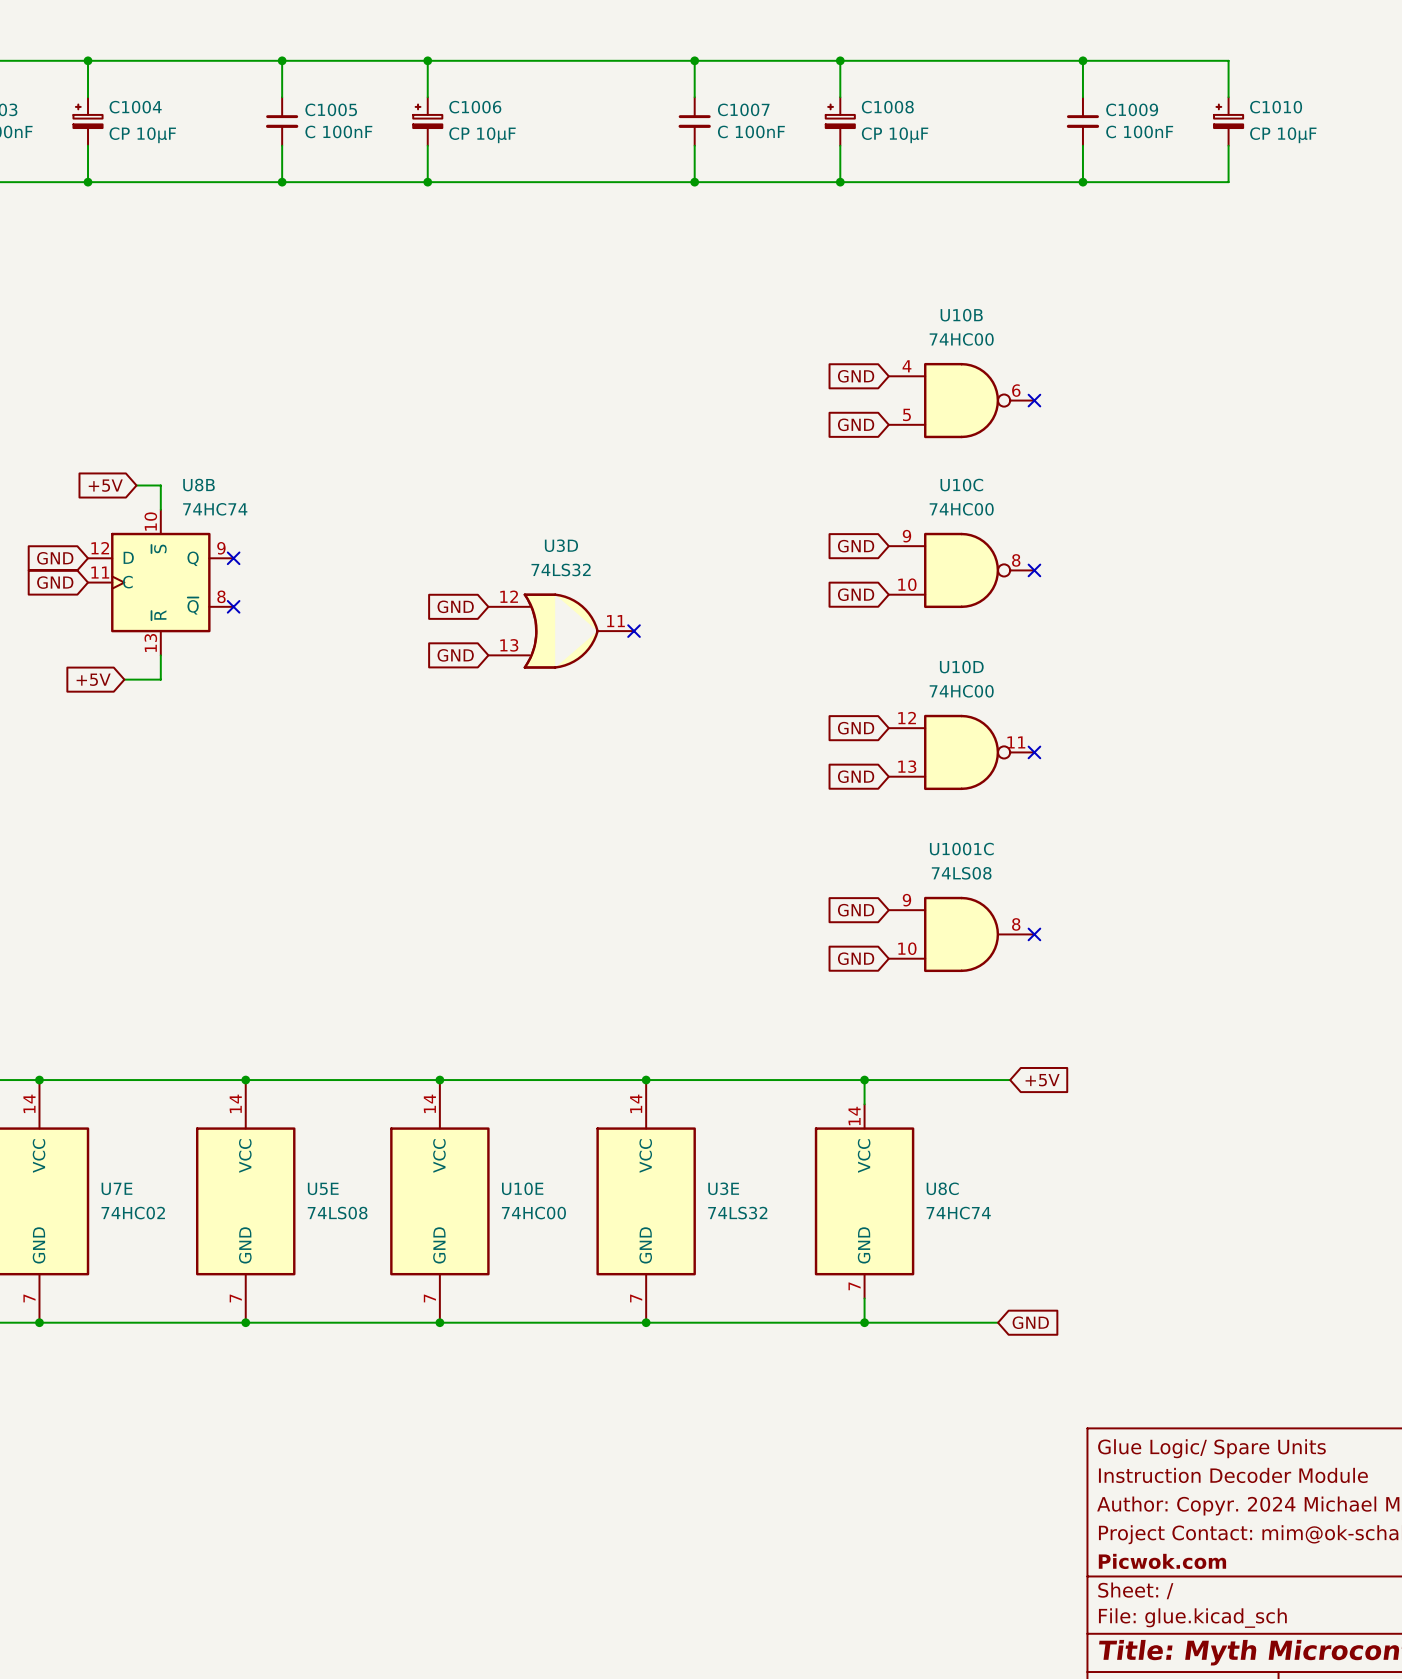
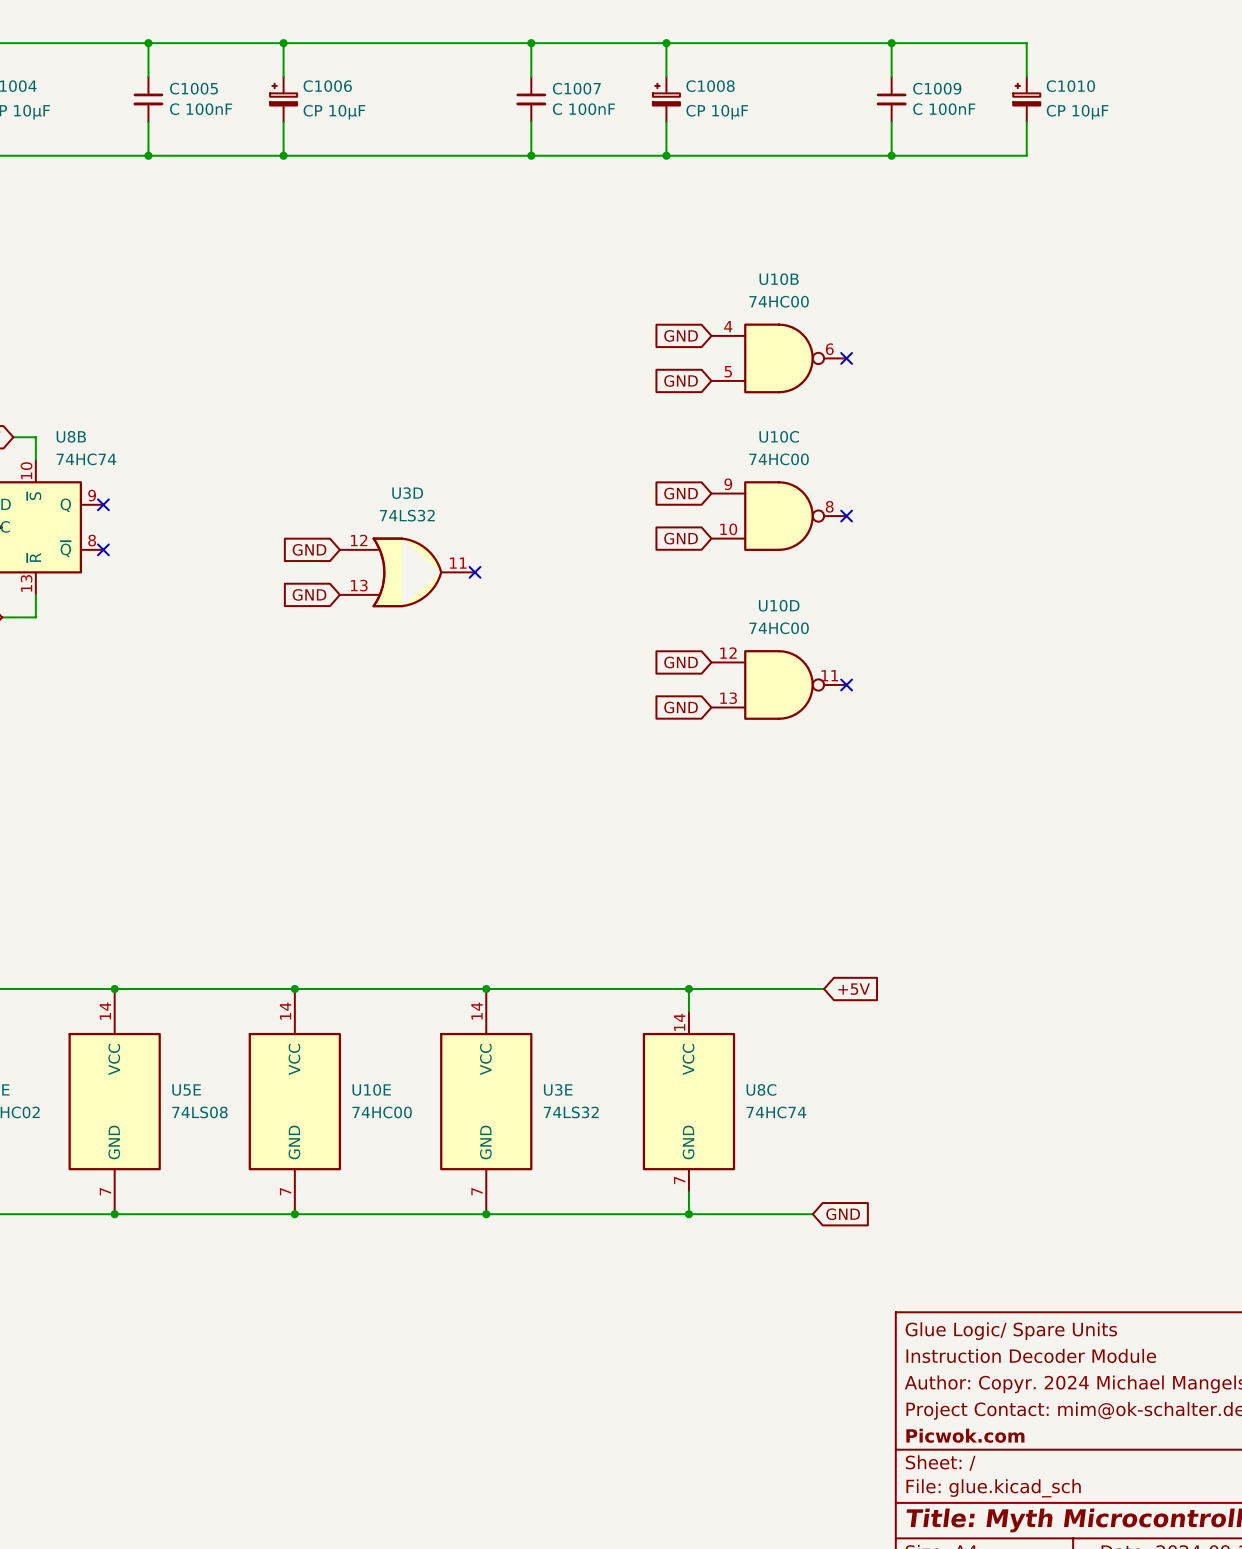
global label: GND (856, 910) -> none
U1001C: 74LS08 (961, 934) -> none
no-connect mark: (1034, 934) -> none
global label: GND (856, 958) -> none

